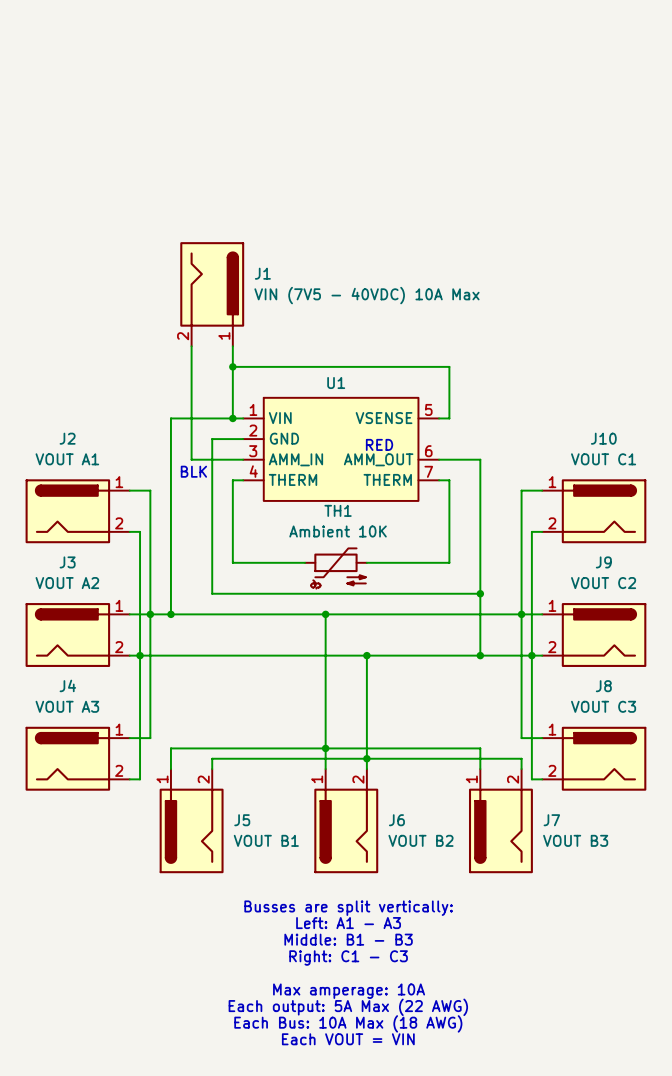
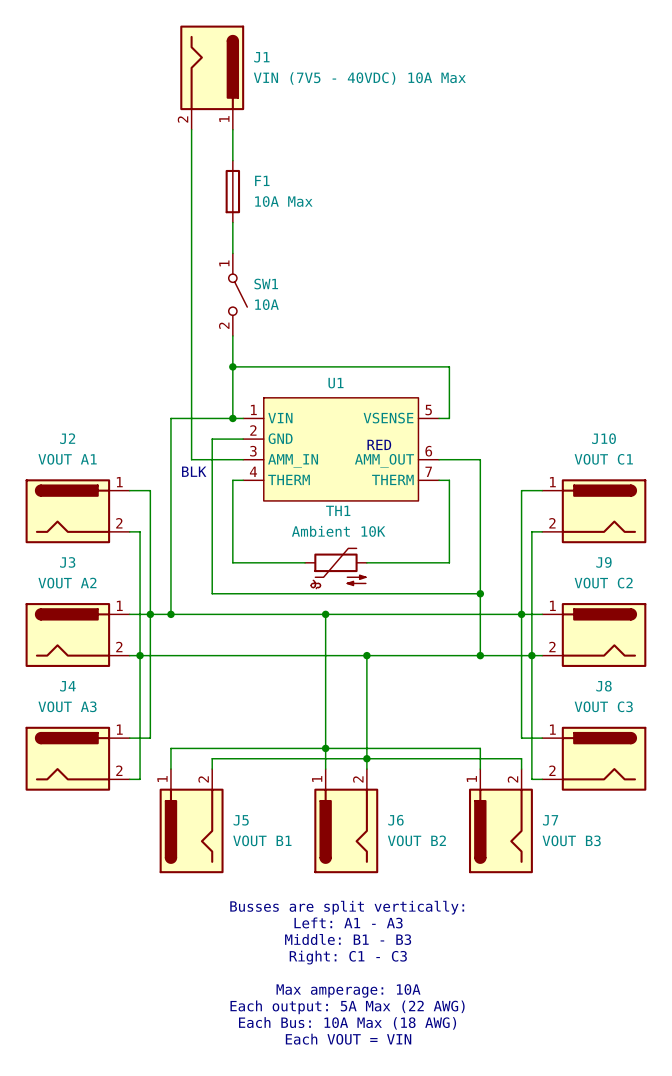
wire: none -> (191, 129) (191, 346)
wire: none -> (232, 129) (232, 160)
F1: none -> 10A Max (232, 191)
wire: none -> (232, 222) (232, 253)
J1 position: (212, 294) -> (212, 77)
SW1: none -> 10A (238, 294)

